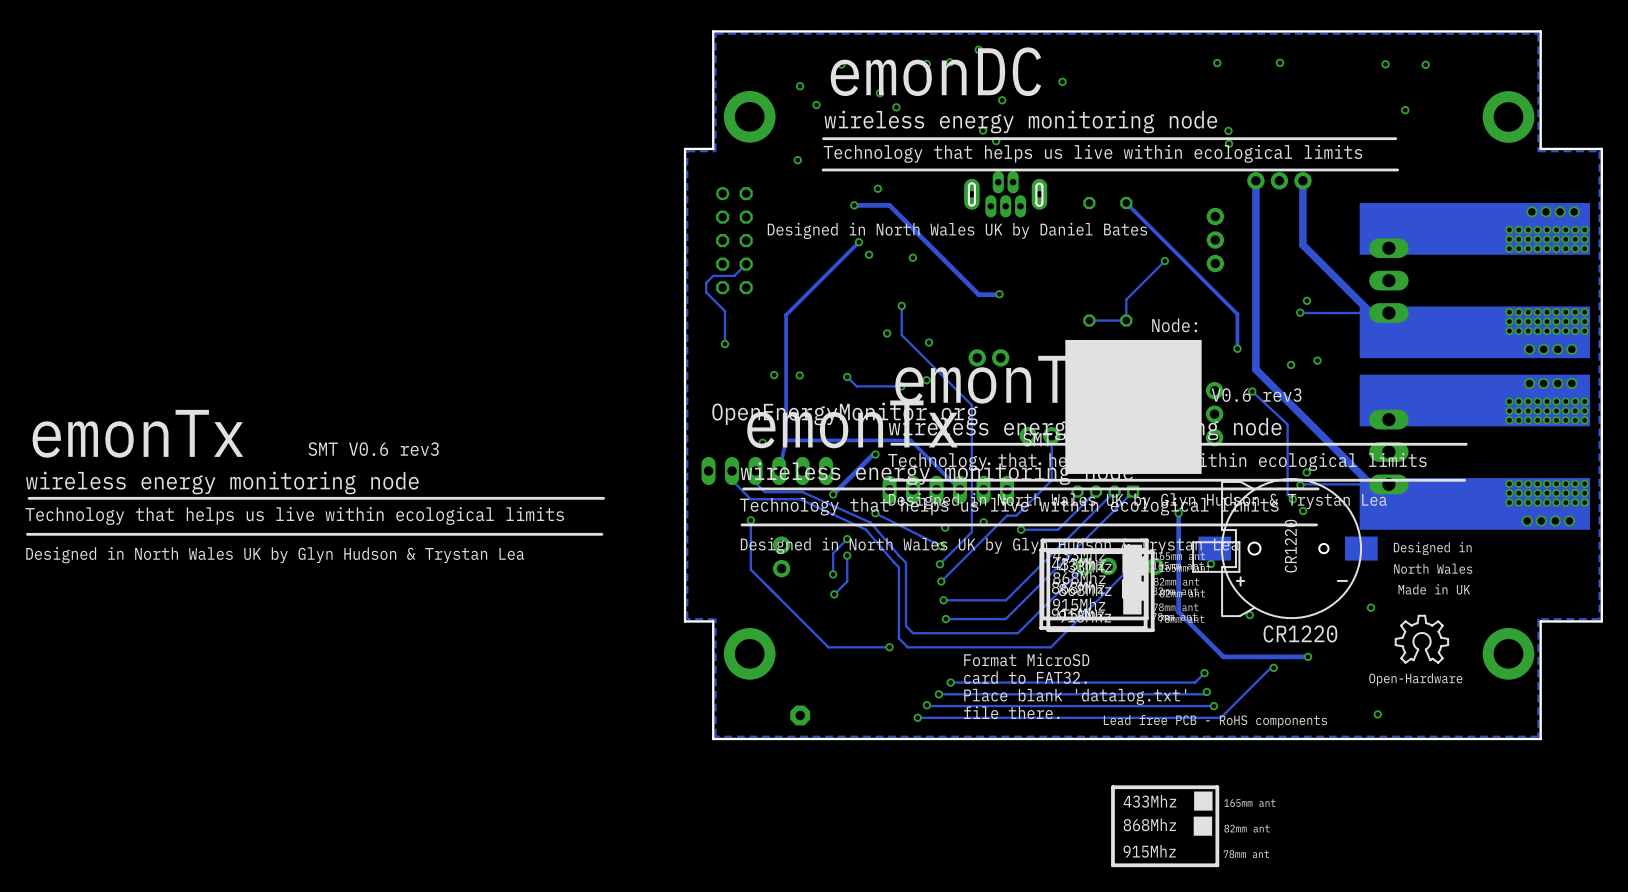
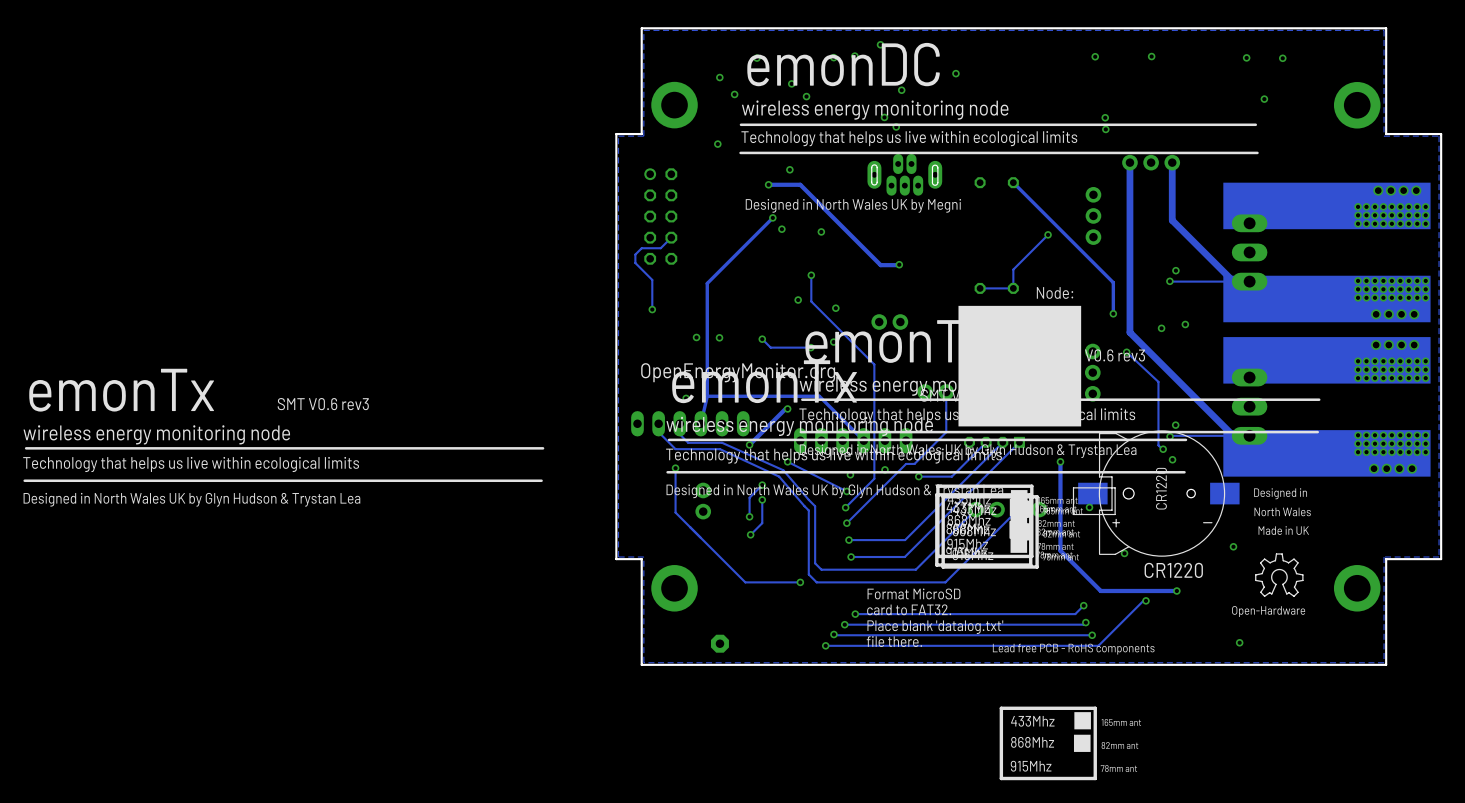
text: Designed in North Wales UK by Daniel Bates (957, 230) -> Designed in North Wales UK by Megni (853, 205)

